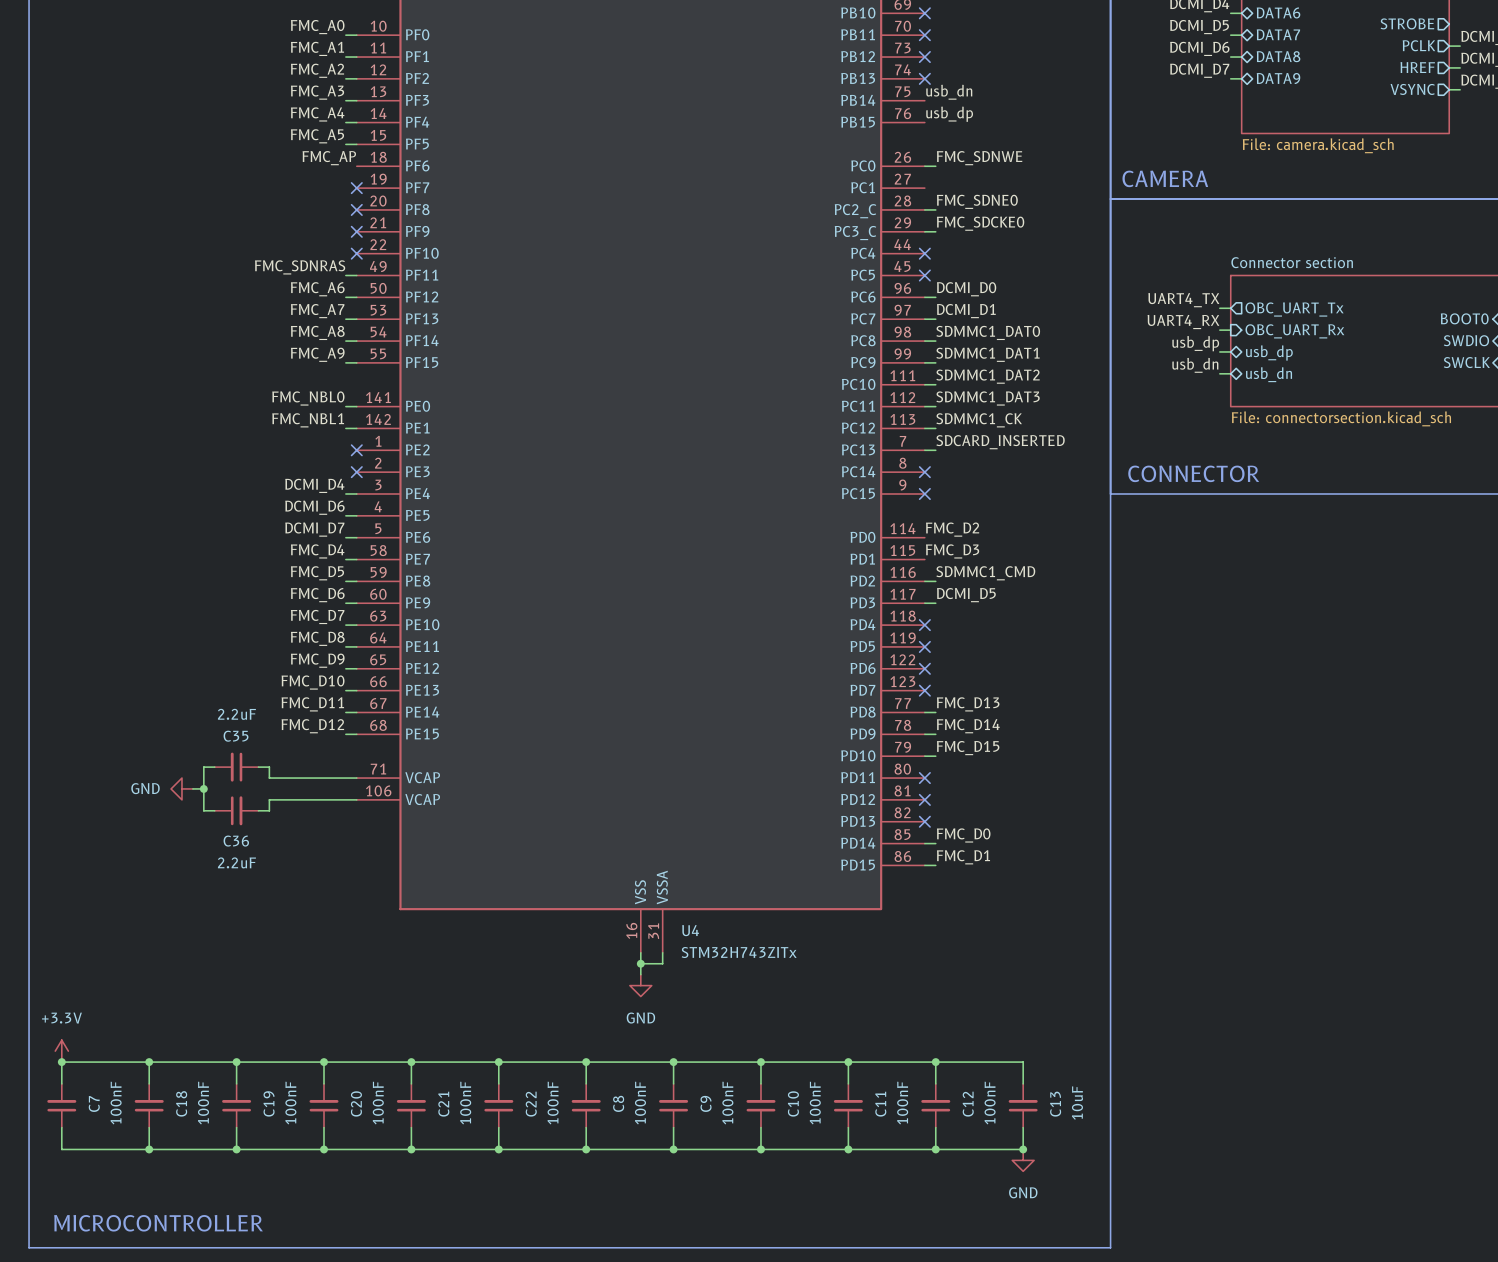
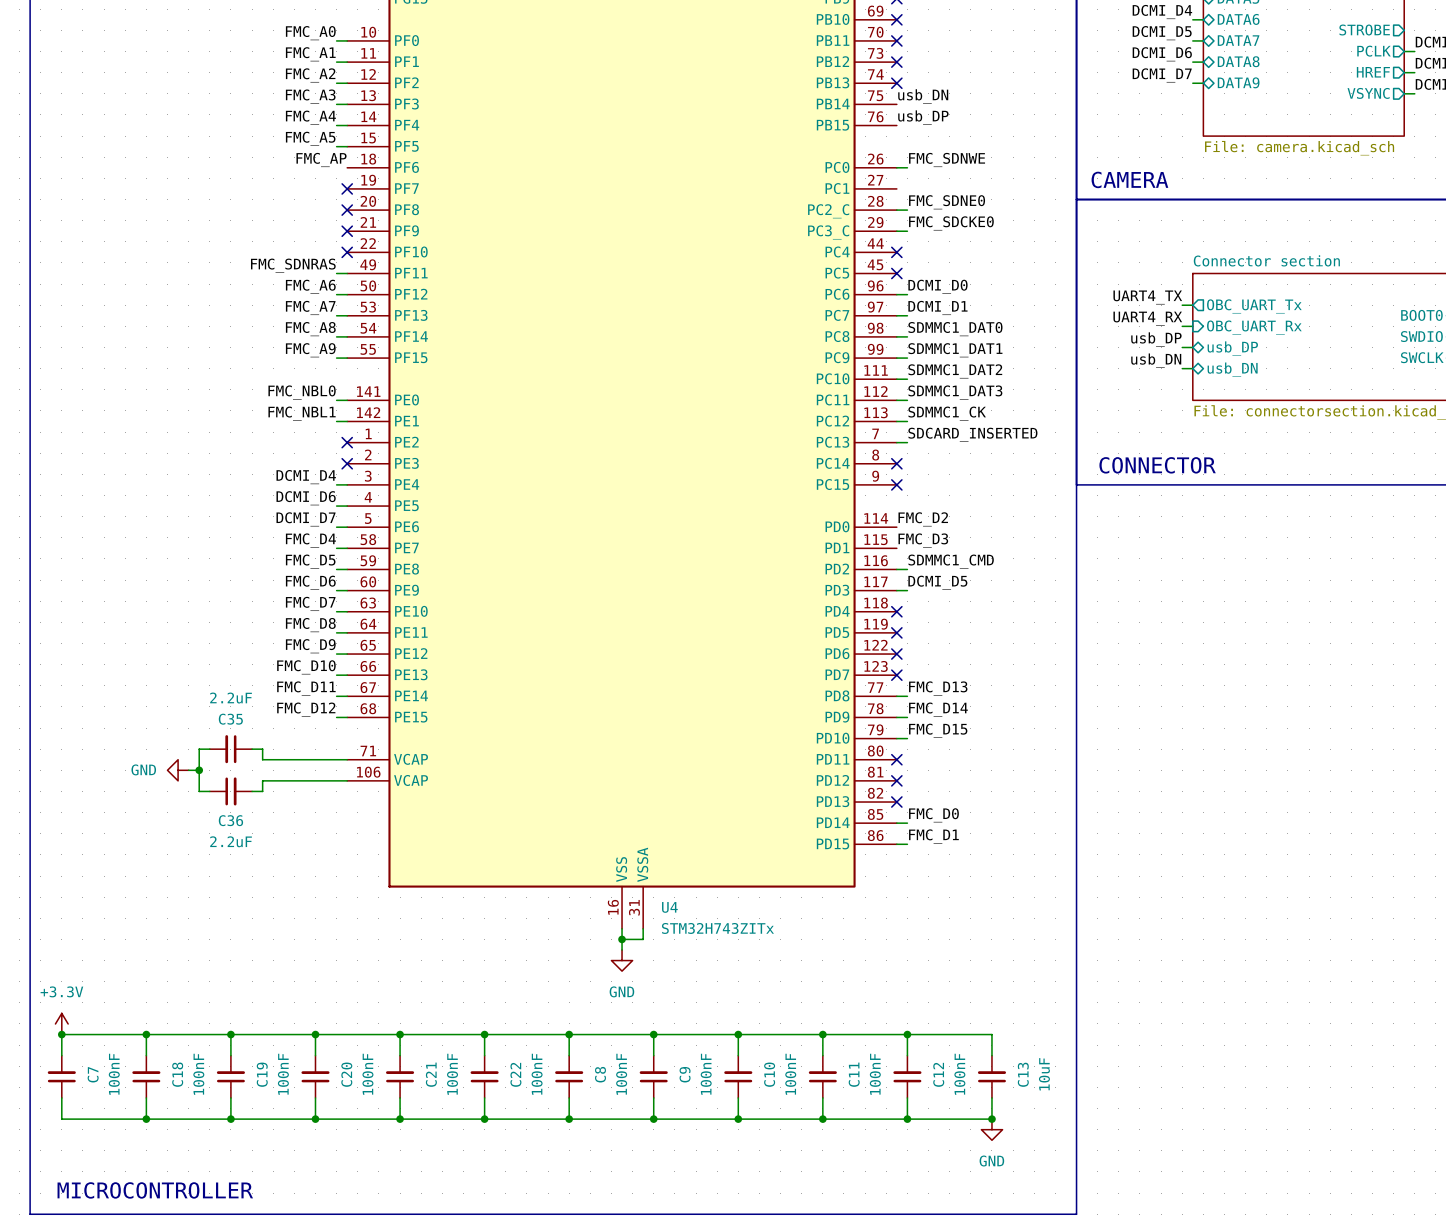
label: usb_dn (949, 92) -> usb_DN (923, 96)
label: usb_dp (949, 114) -> usb_DP (923, 117)
label: usb_dp (1195, 343) -> usb_DP (1156, 339)
sheet pin: usb_dp (1269, 353) -> usb_DP (1232, 348)
label: usb_dn (1195, 365) -> usb_DN (1156, 360)
sheet pin: usb_dn (1269, 374) -> usb_DN (1232, 369)

